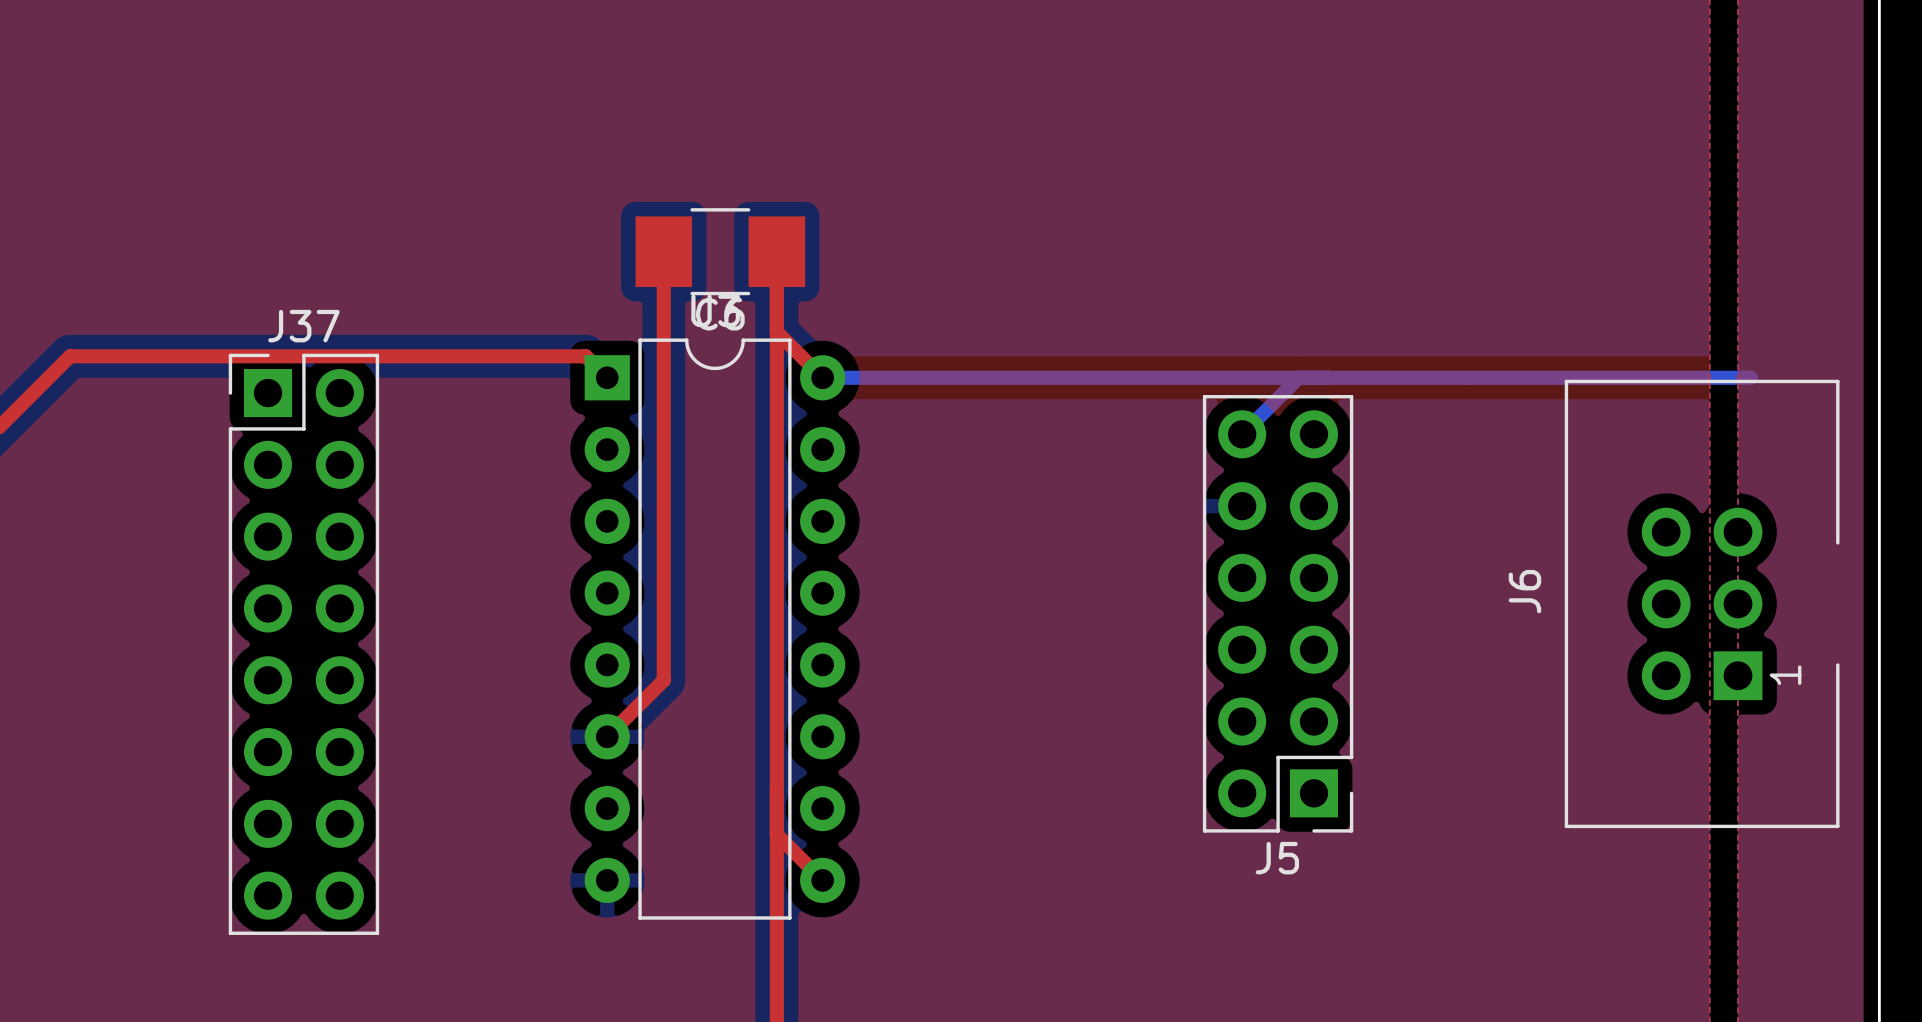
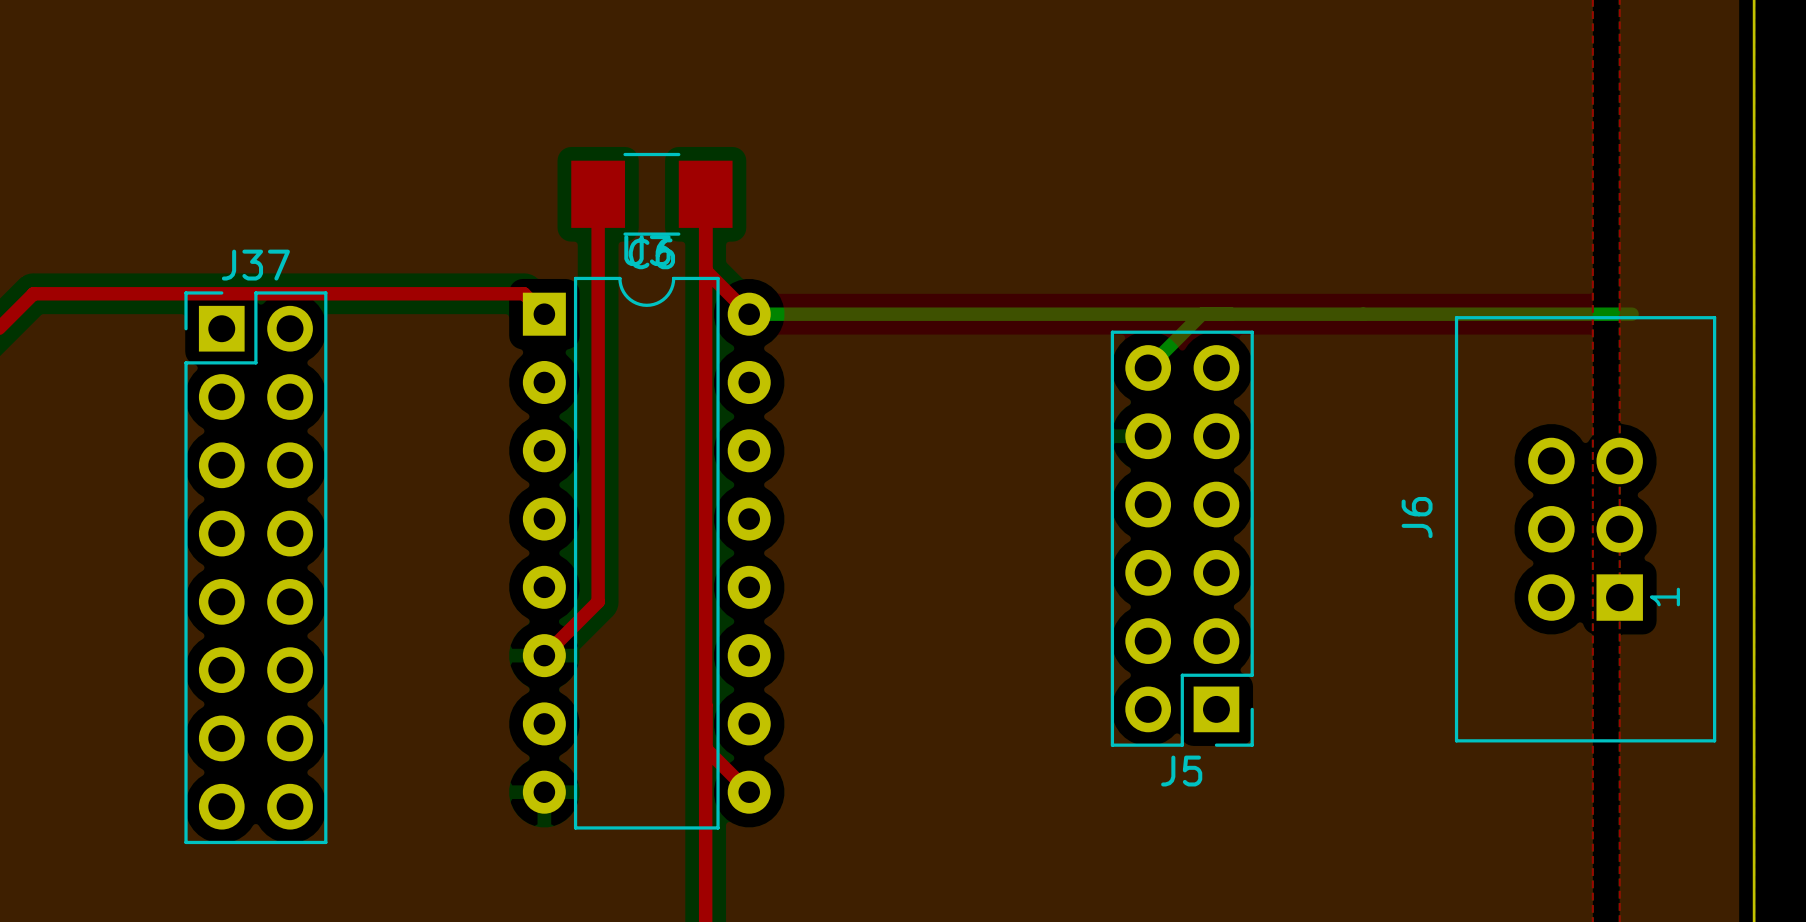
J6 footprint: [1564, 379, 1840, 829] -> [1454, 316, 1717, 743]

